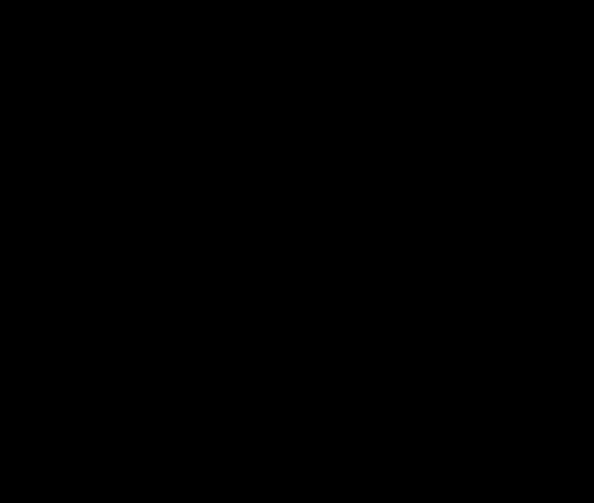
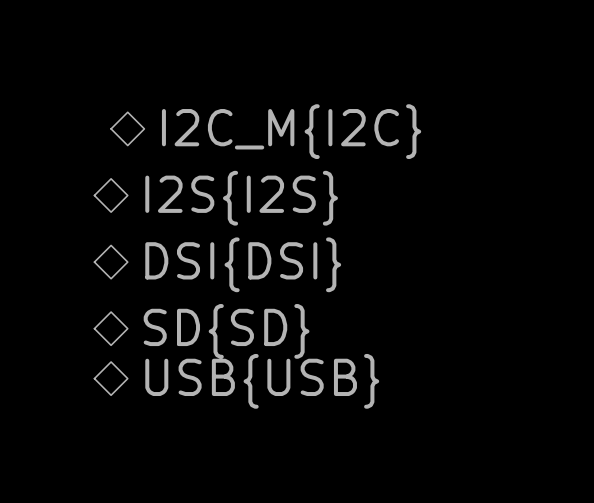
hierarchical label: none -> I2C_M{I2C} (291, 131)
hierarchical label: none -> I2S{I2S} (241, 198)
hierarchical label: none -> DSI{DSI} (243, 264)
hierarchical label: none -> SD{SD} (226, 331)
hierarchical label: none -> USB{USB} (262, 381)

